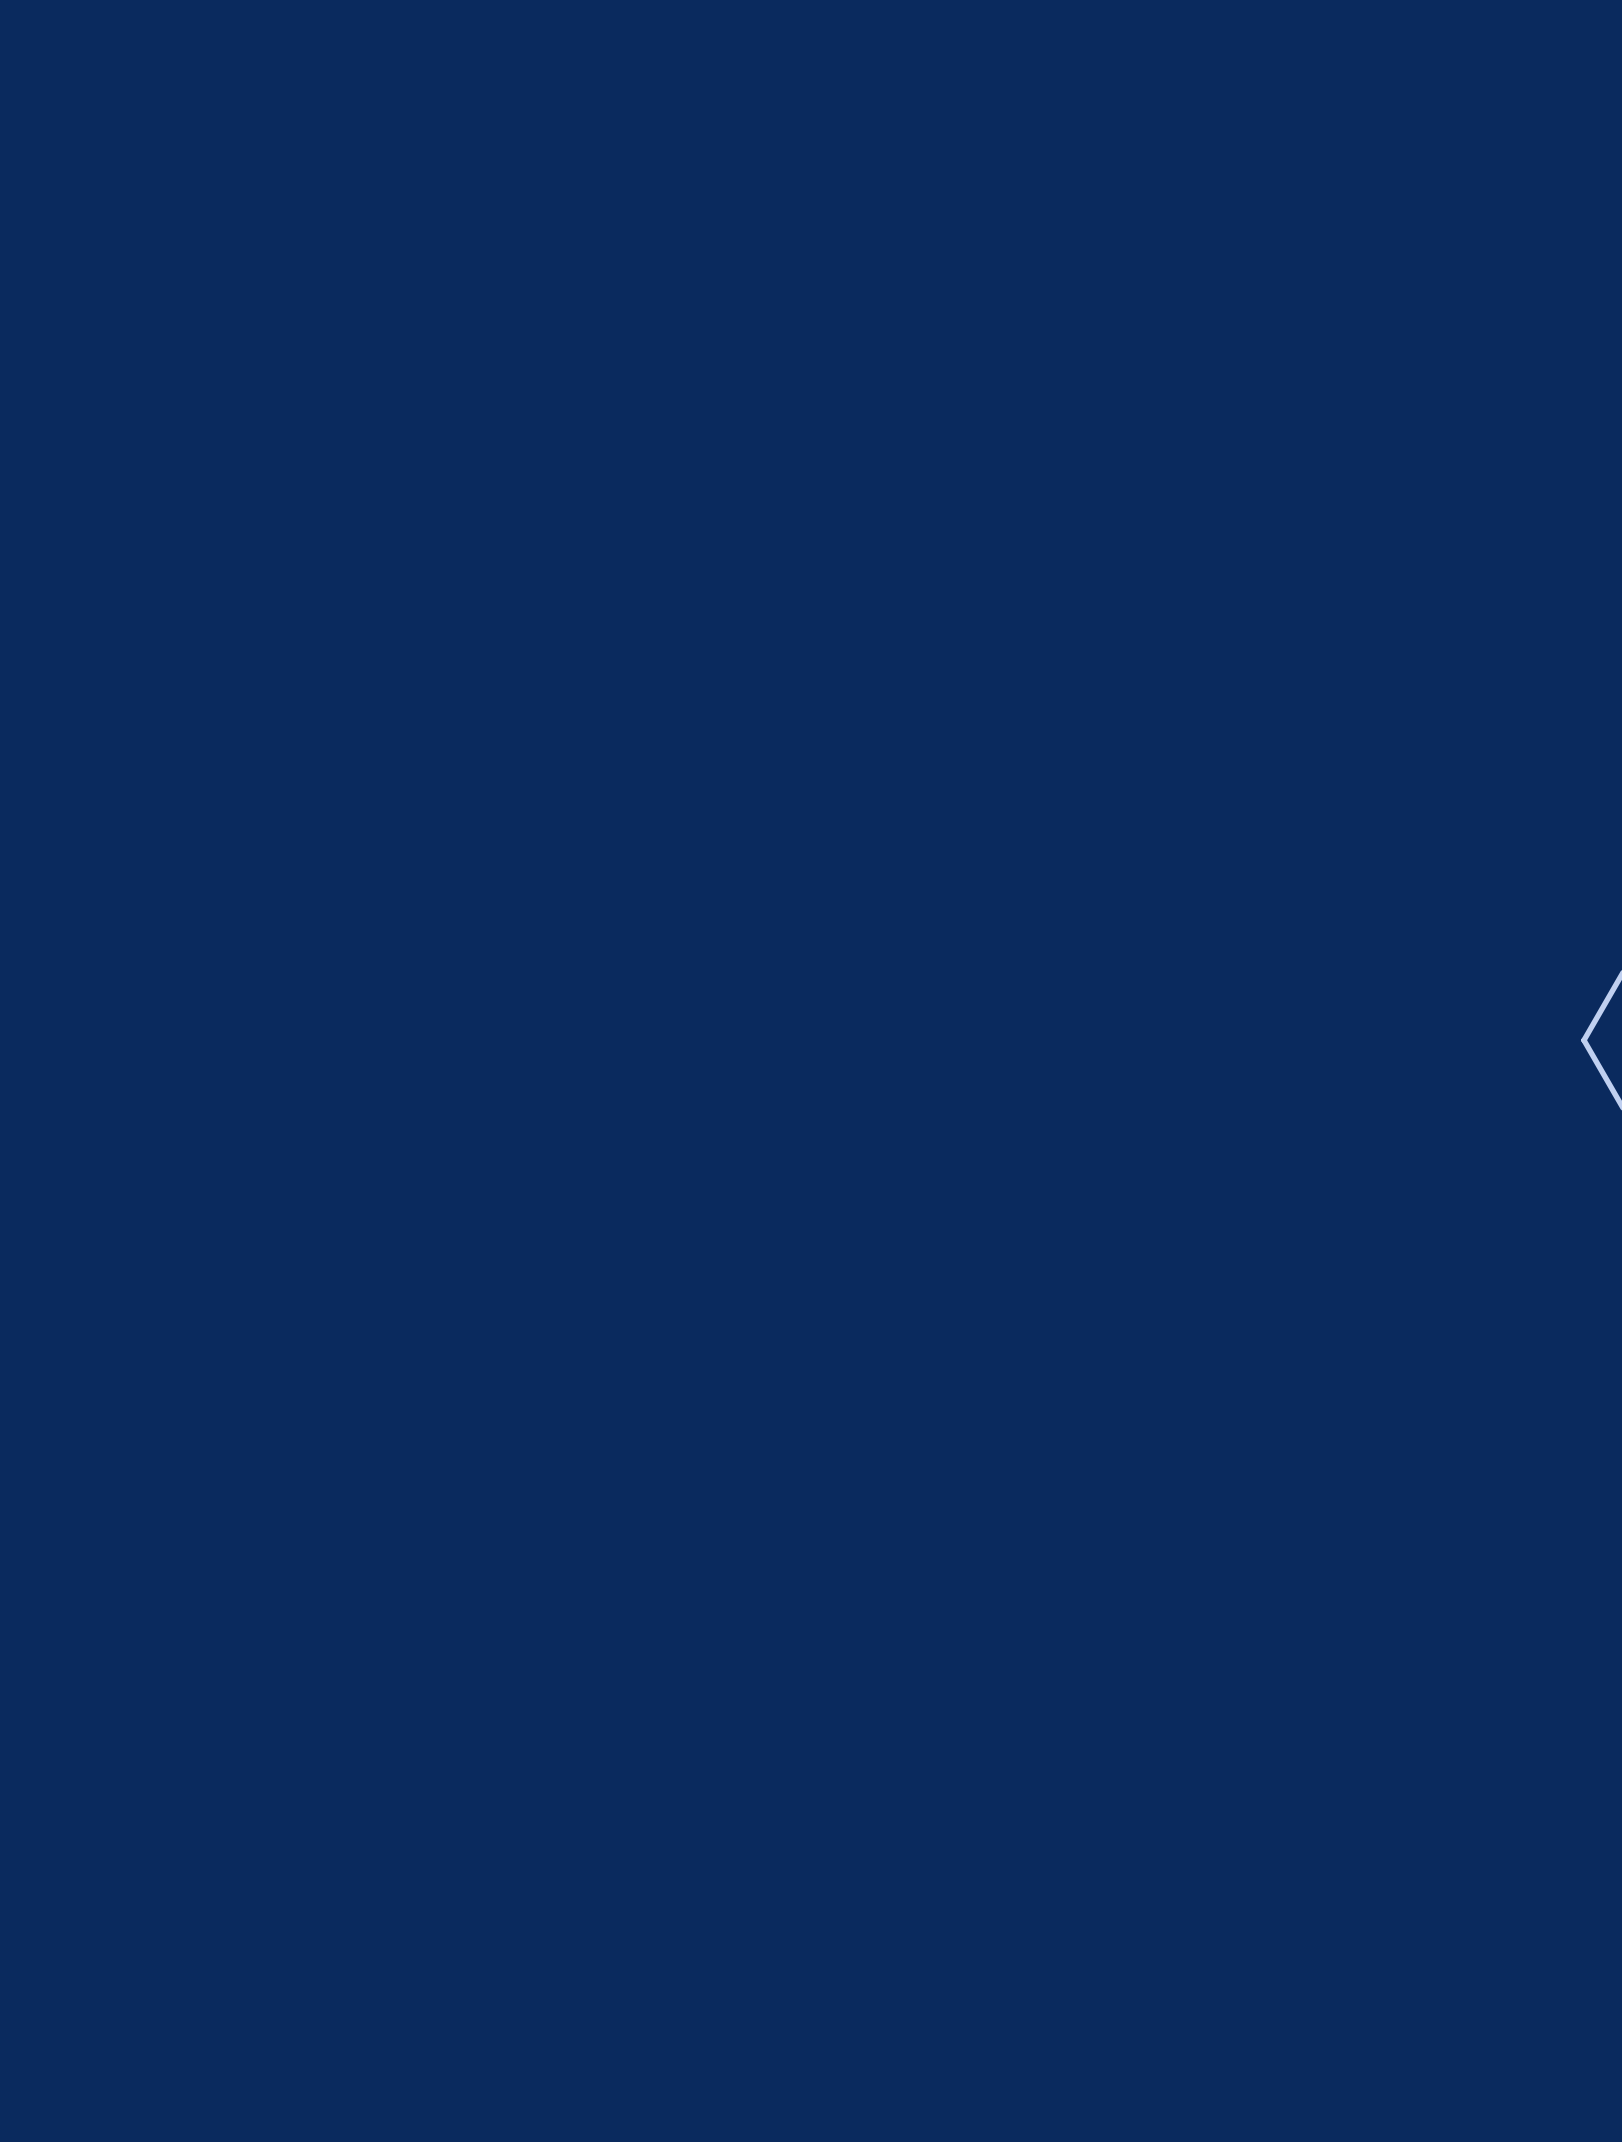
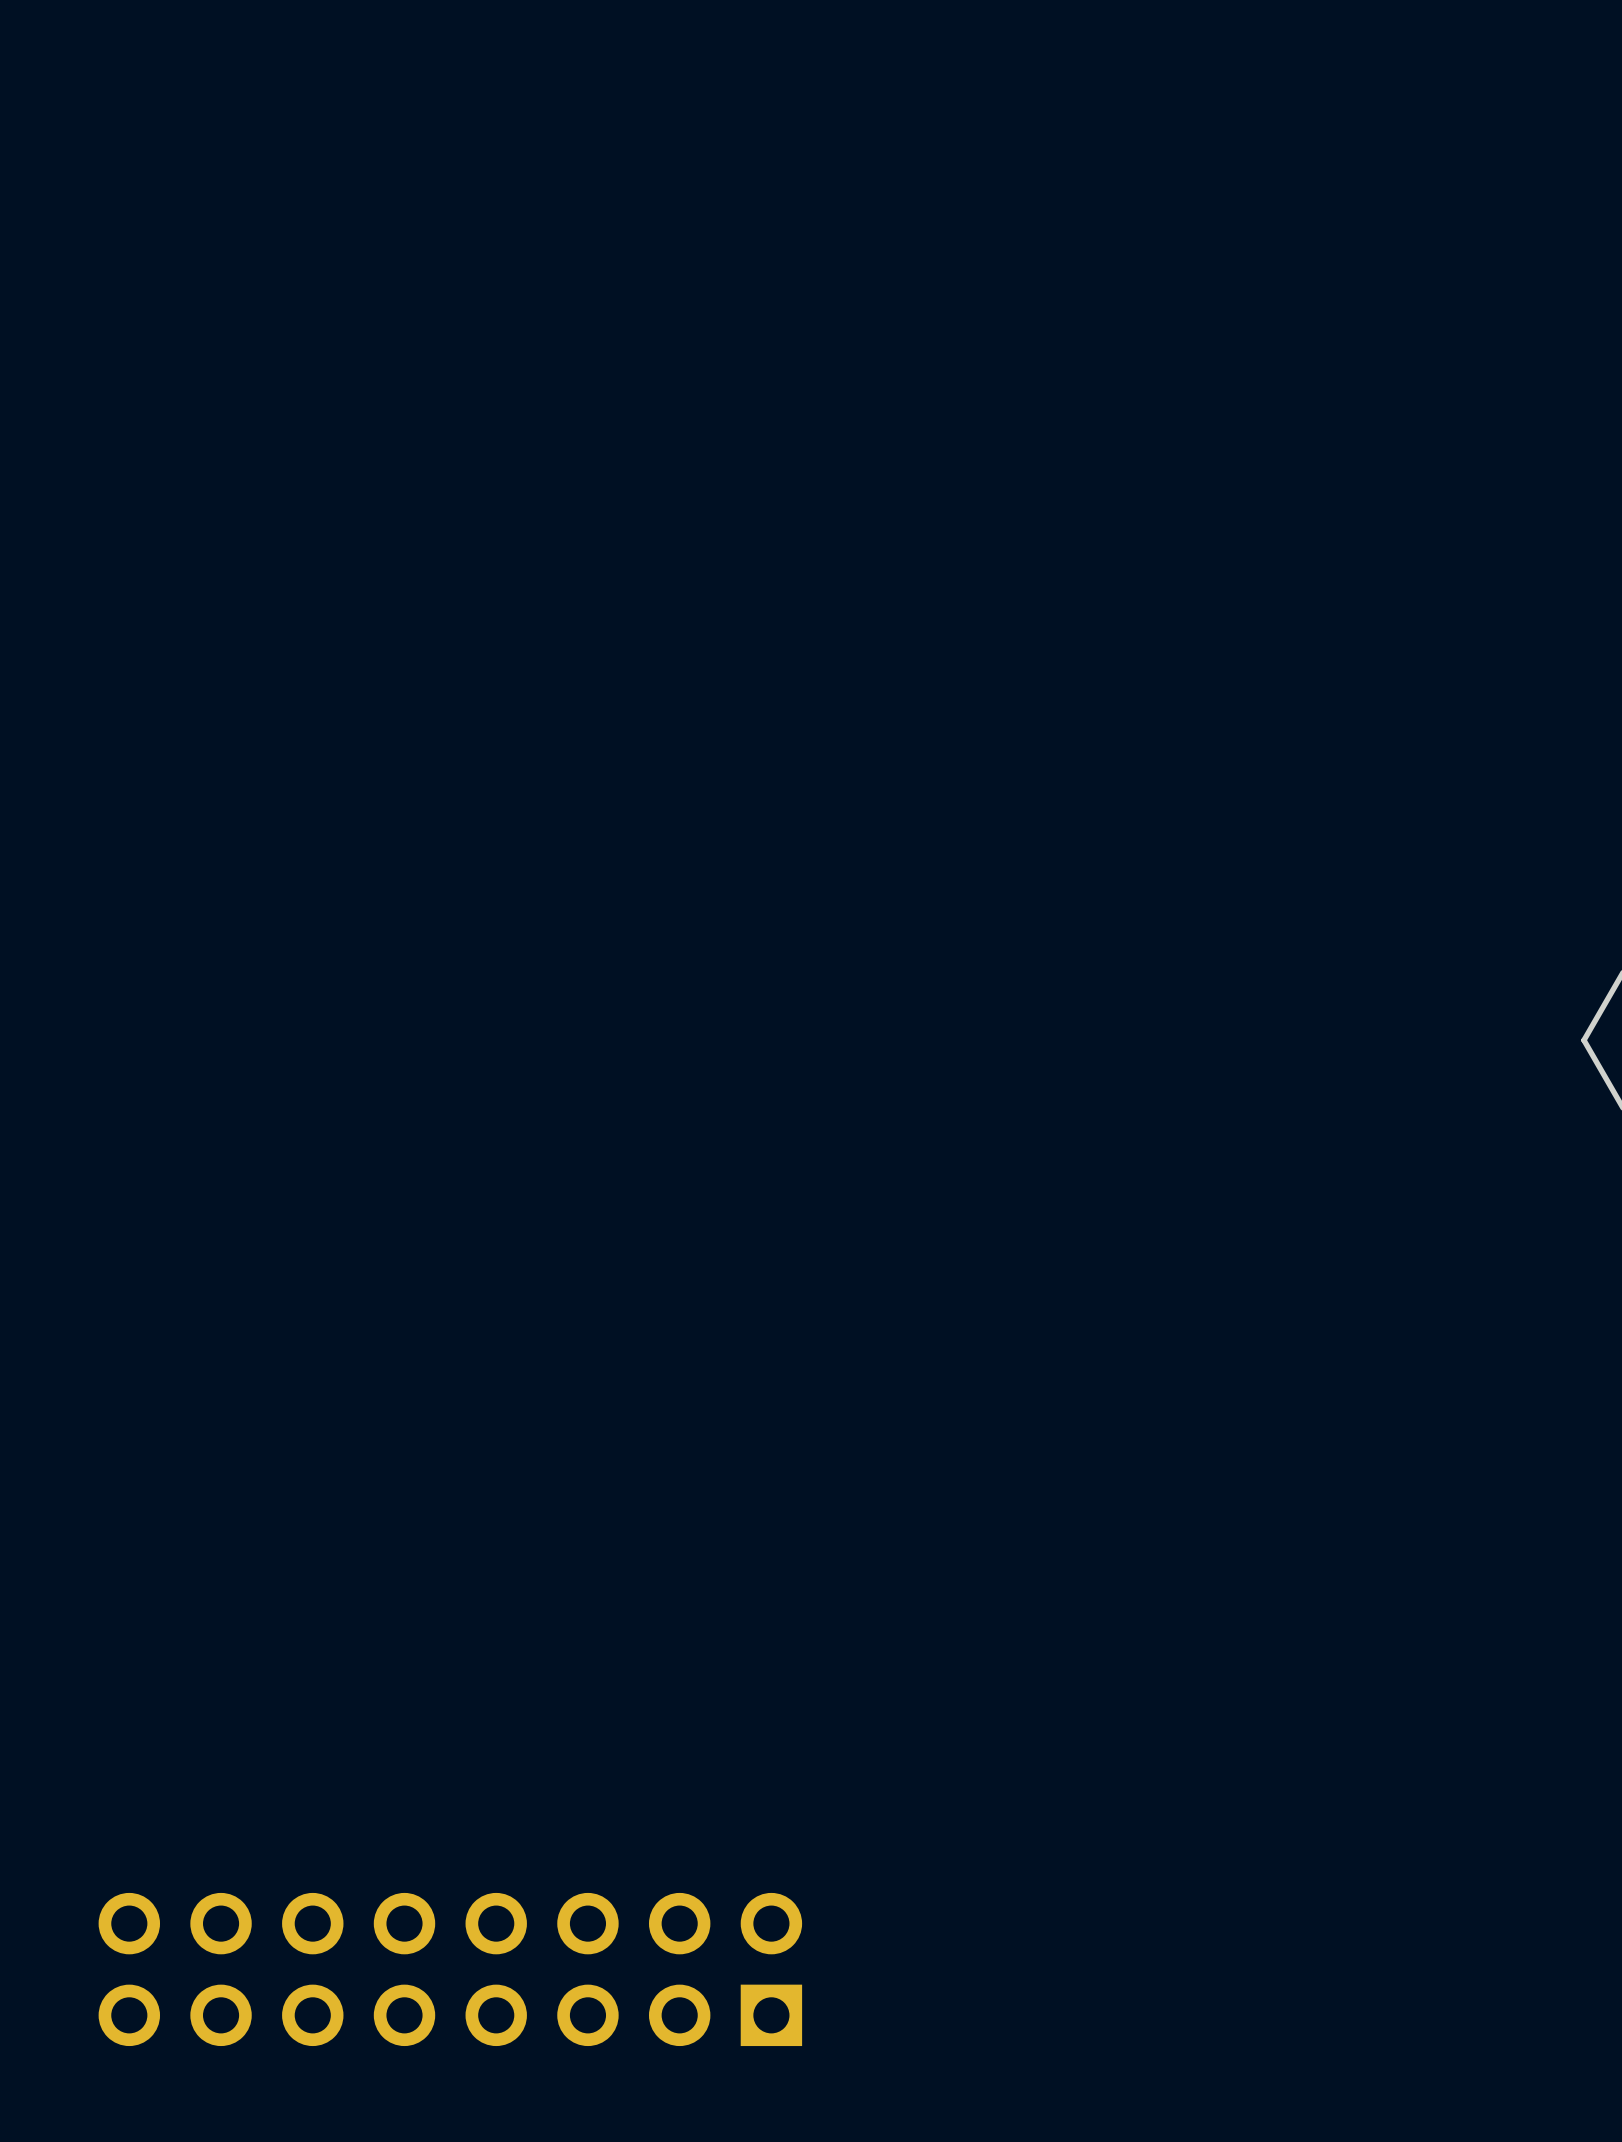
part: none -> (450, 1969)

